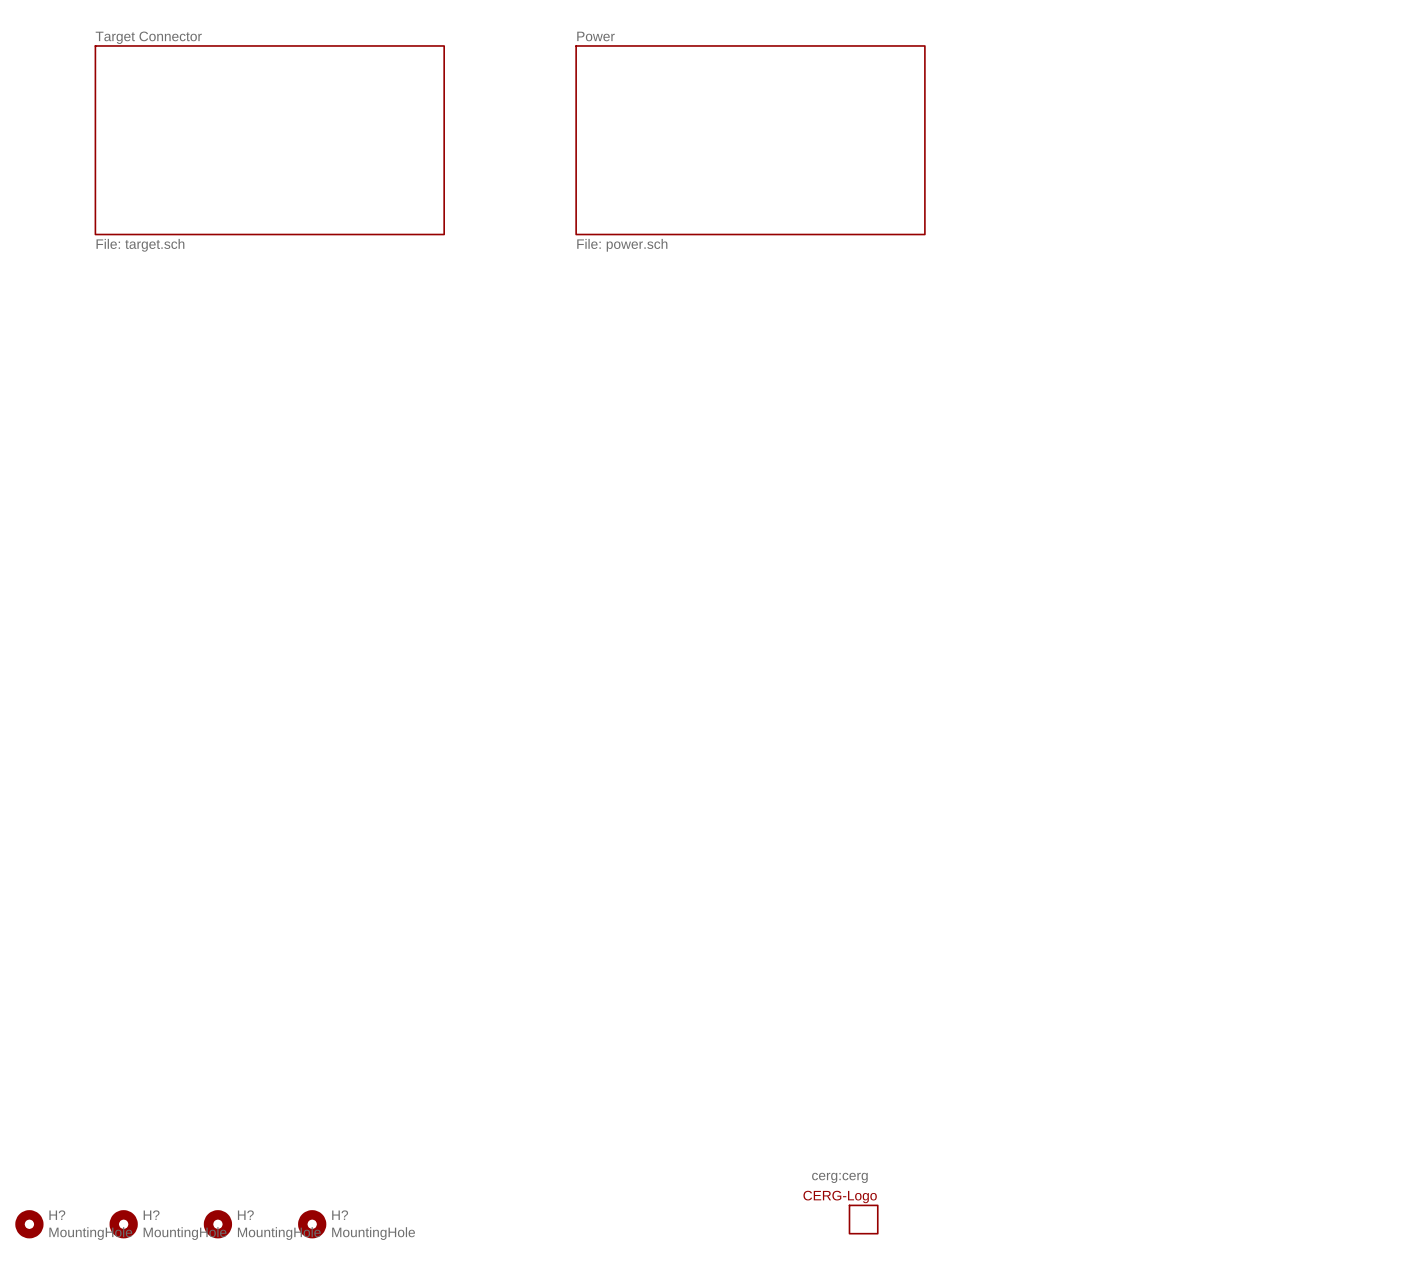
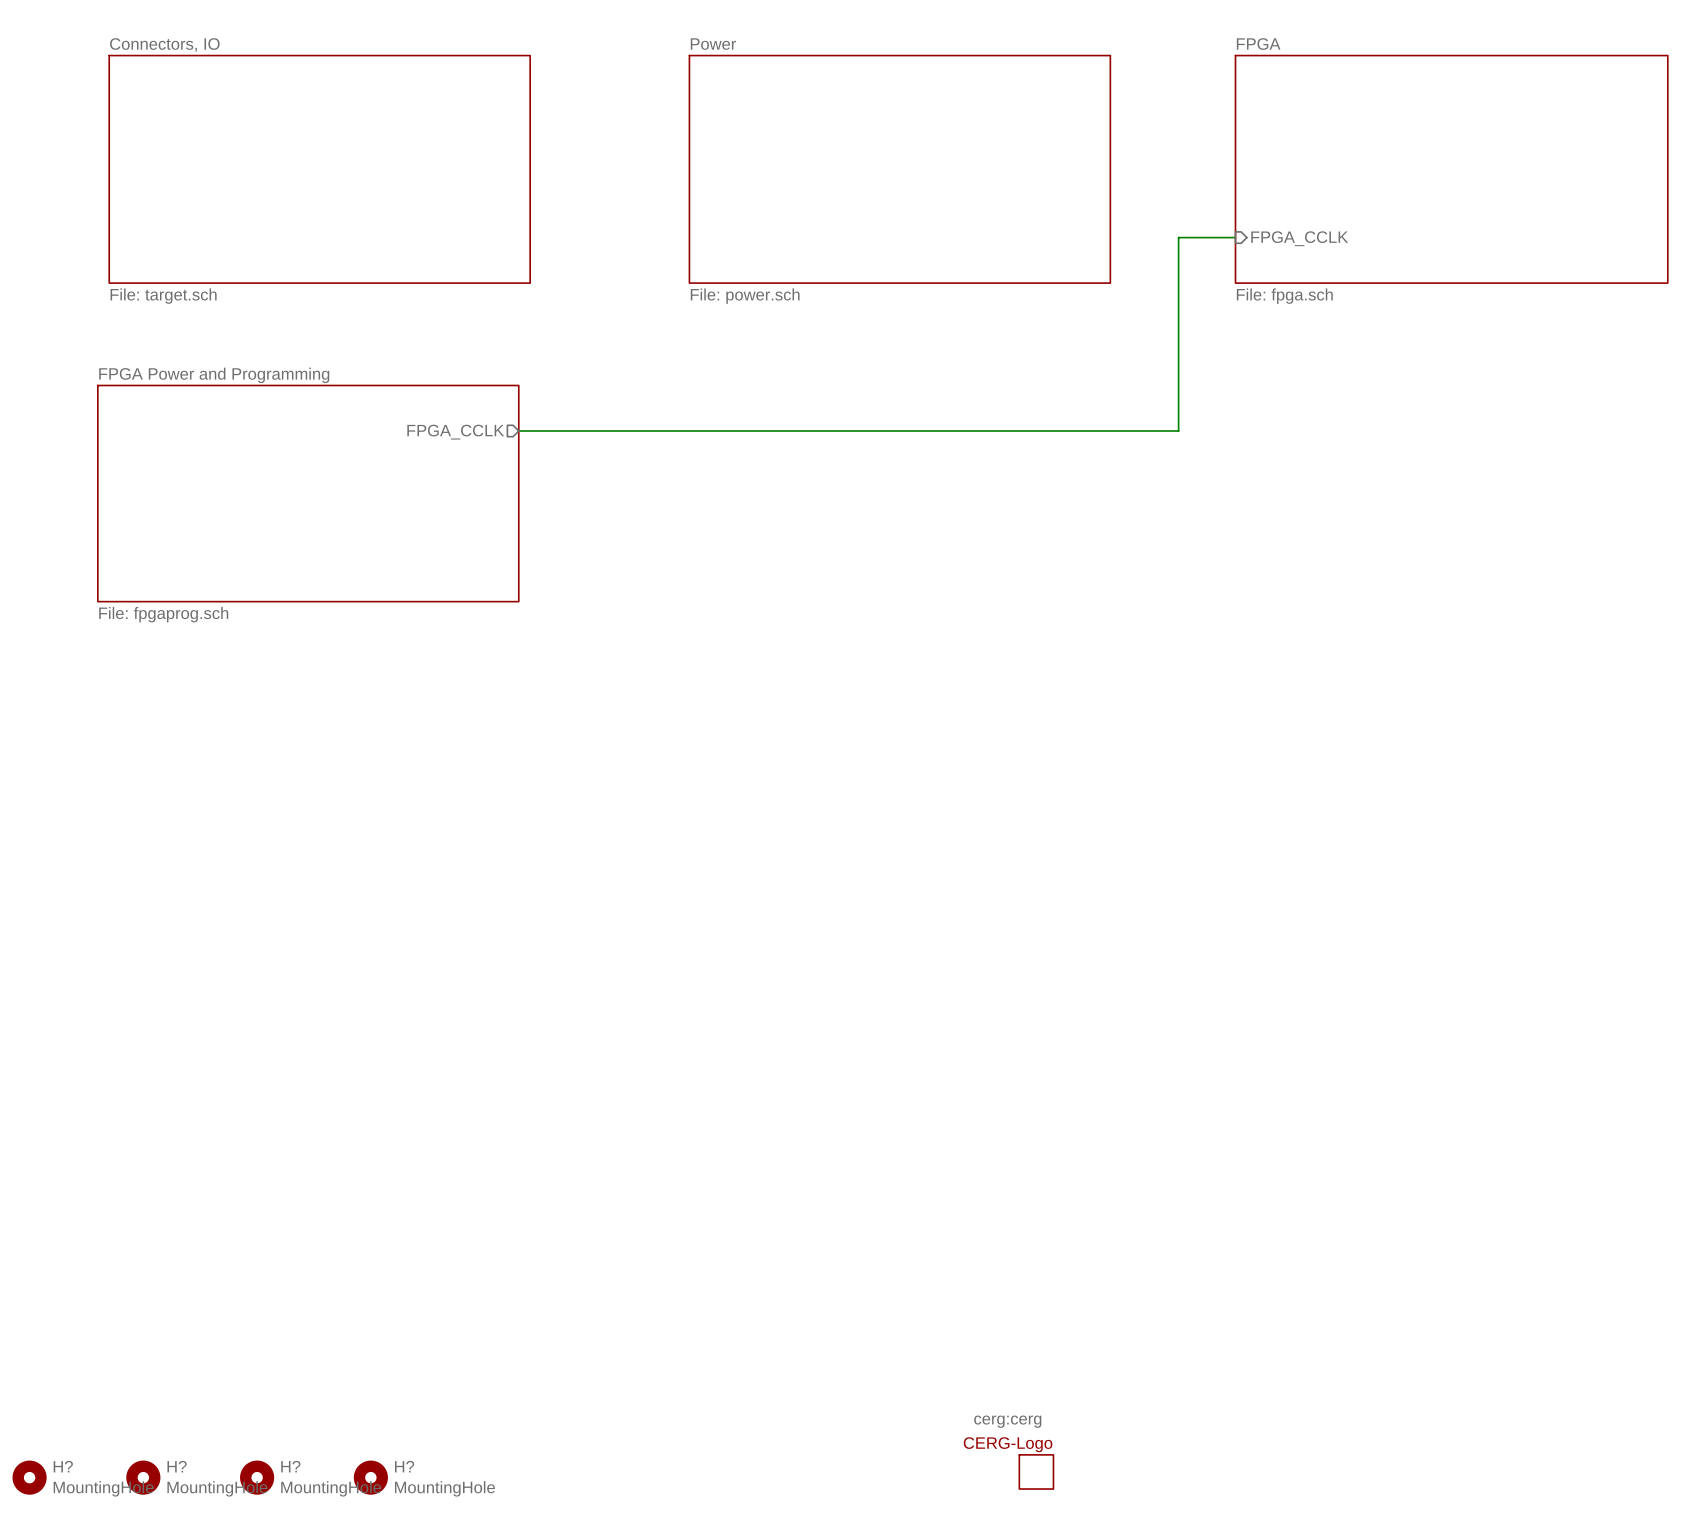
sheet Target Connector name: Target Connector (148, 37) -> Connectors, IO (164, 44)
sheet FPGA: none -> File: fpga.sch (1451, 169)
wire: none -> (1235, 237) (1178, 237) (1178, 430) (518, 430)
sheet pin: none -> FPGA_CCLK (1299, 238)
sheet pin: none -> FPGA_CCLK (455, 432)
sheet FPGA Power and Programming: none -> File: fpgaprog.sch (308, 493)

